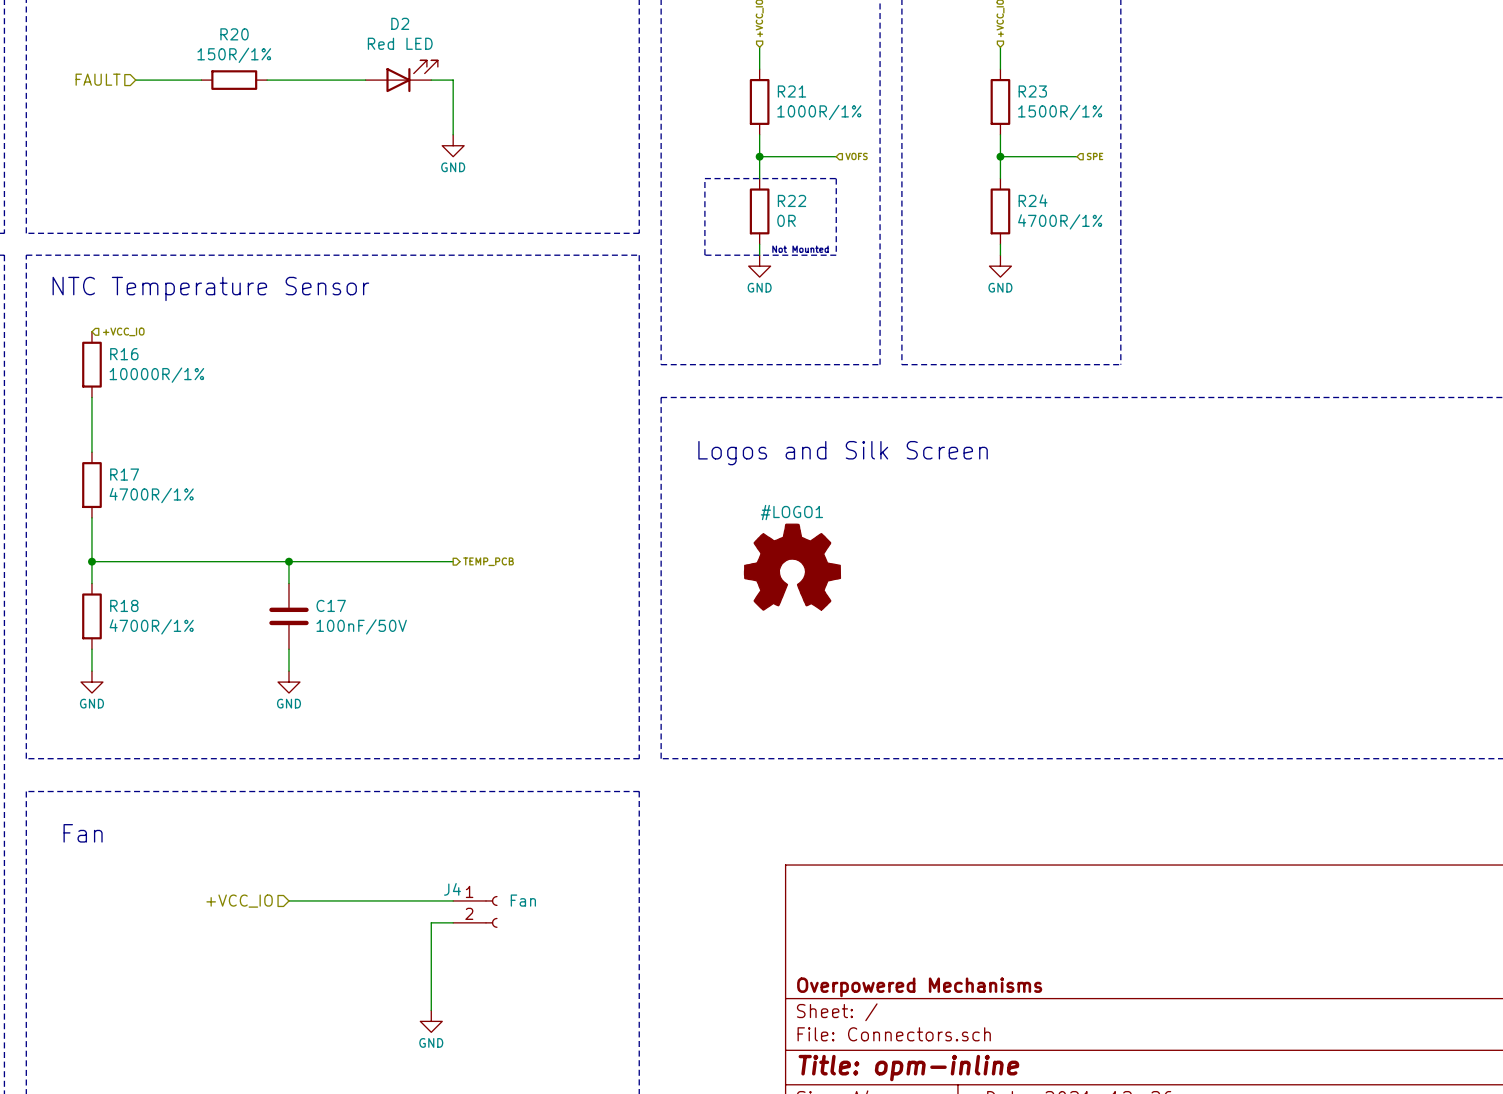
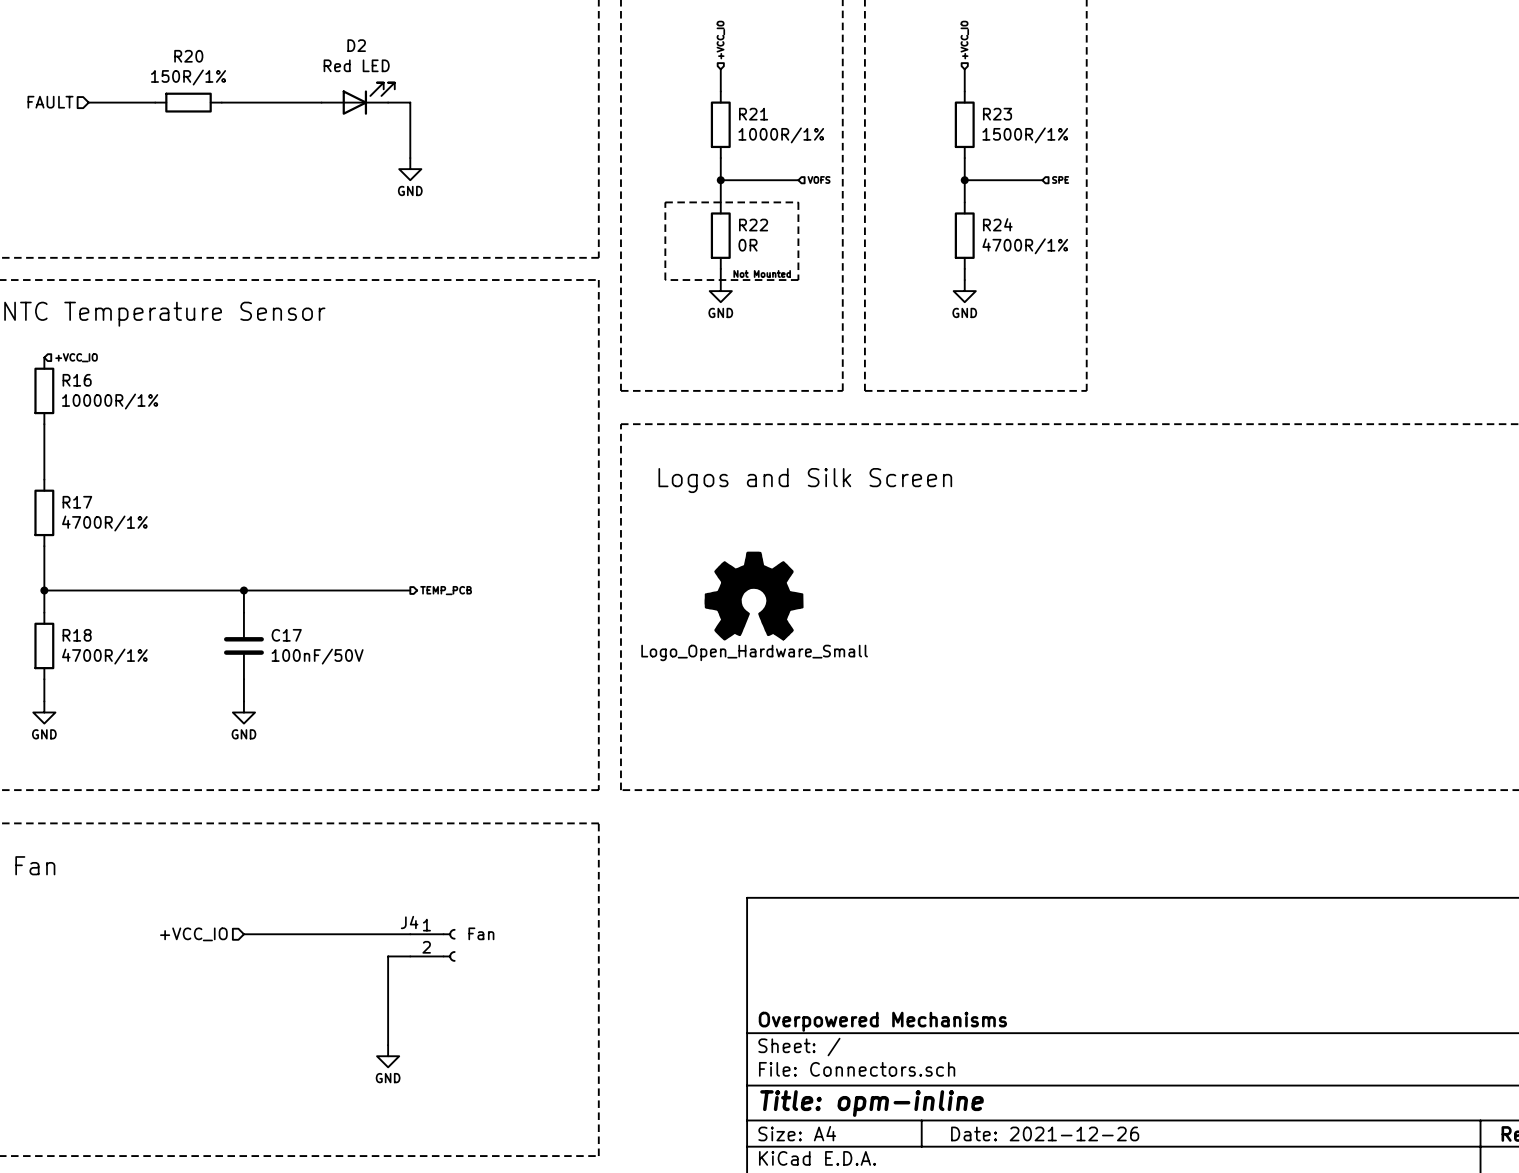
#LOGO1 name: #LOGO1 (791, 512) -> none
#LOGO1 text: none -> Logo_Open_Hardware_Small (754, 652)

